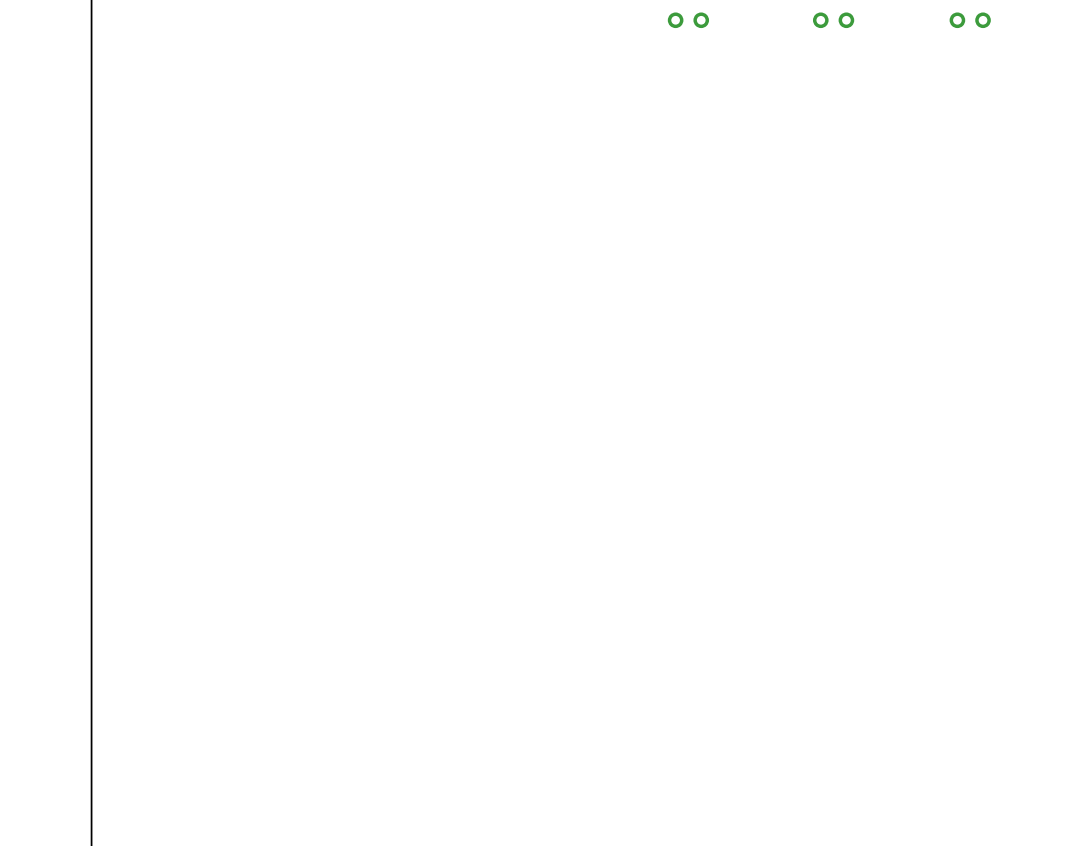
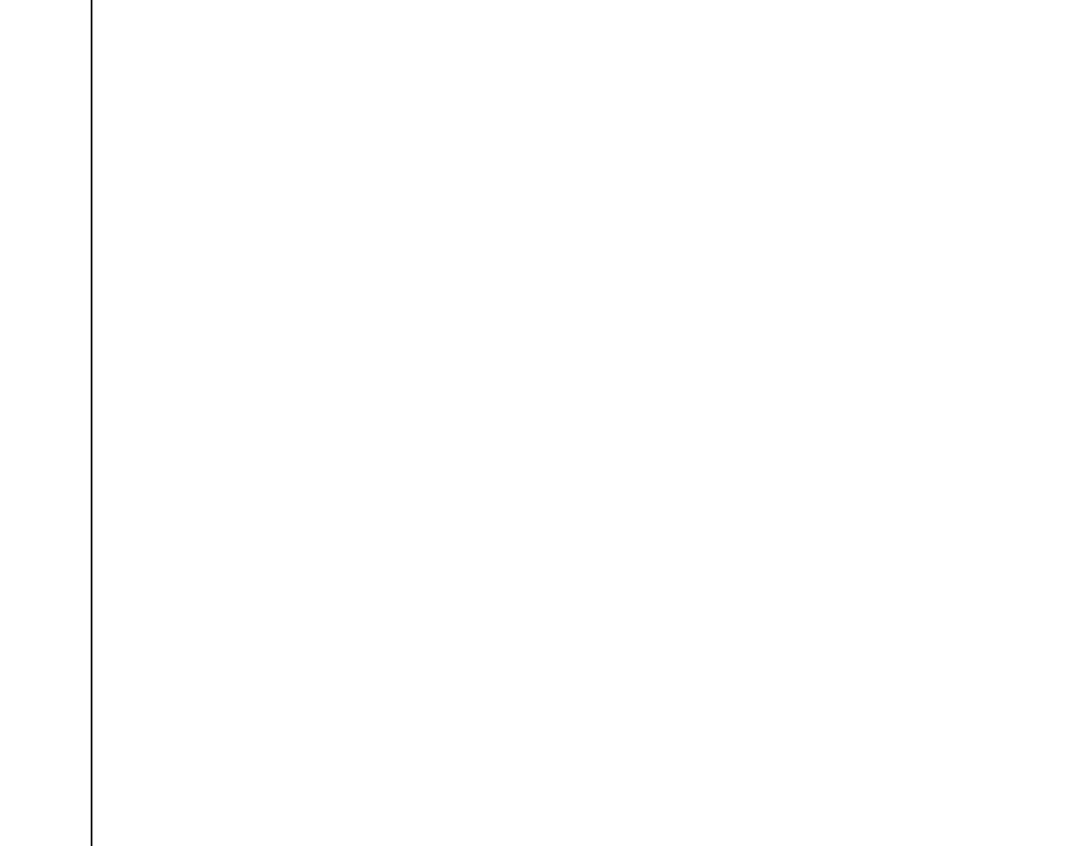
via: (675, 20) -> none
via: (701, 20) -> none
via: (820, 20) -> none
via: (846, 20) -> none
via: (957, 20) -> none
via: (983, 20) -> none

